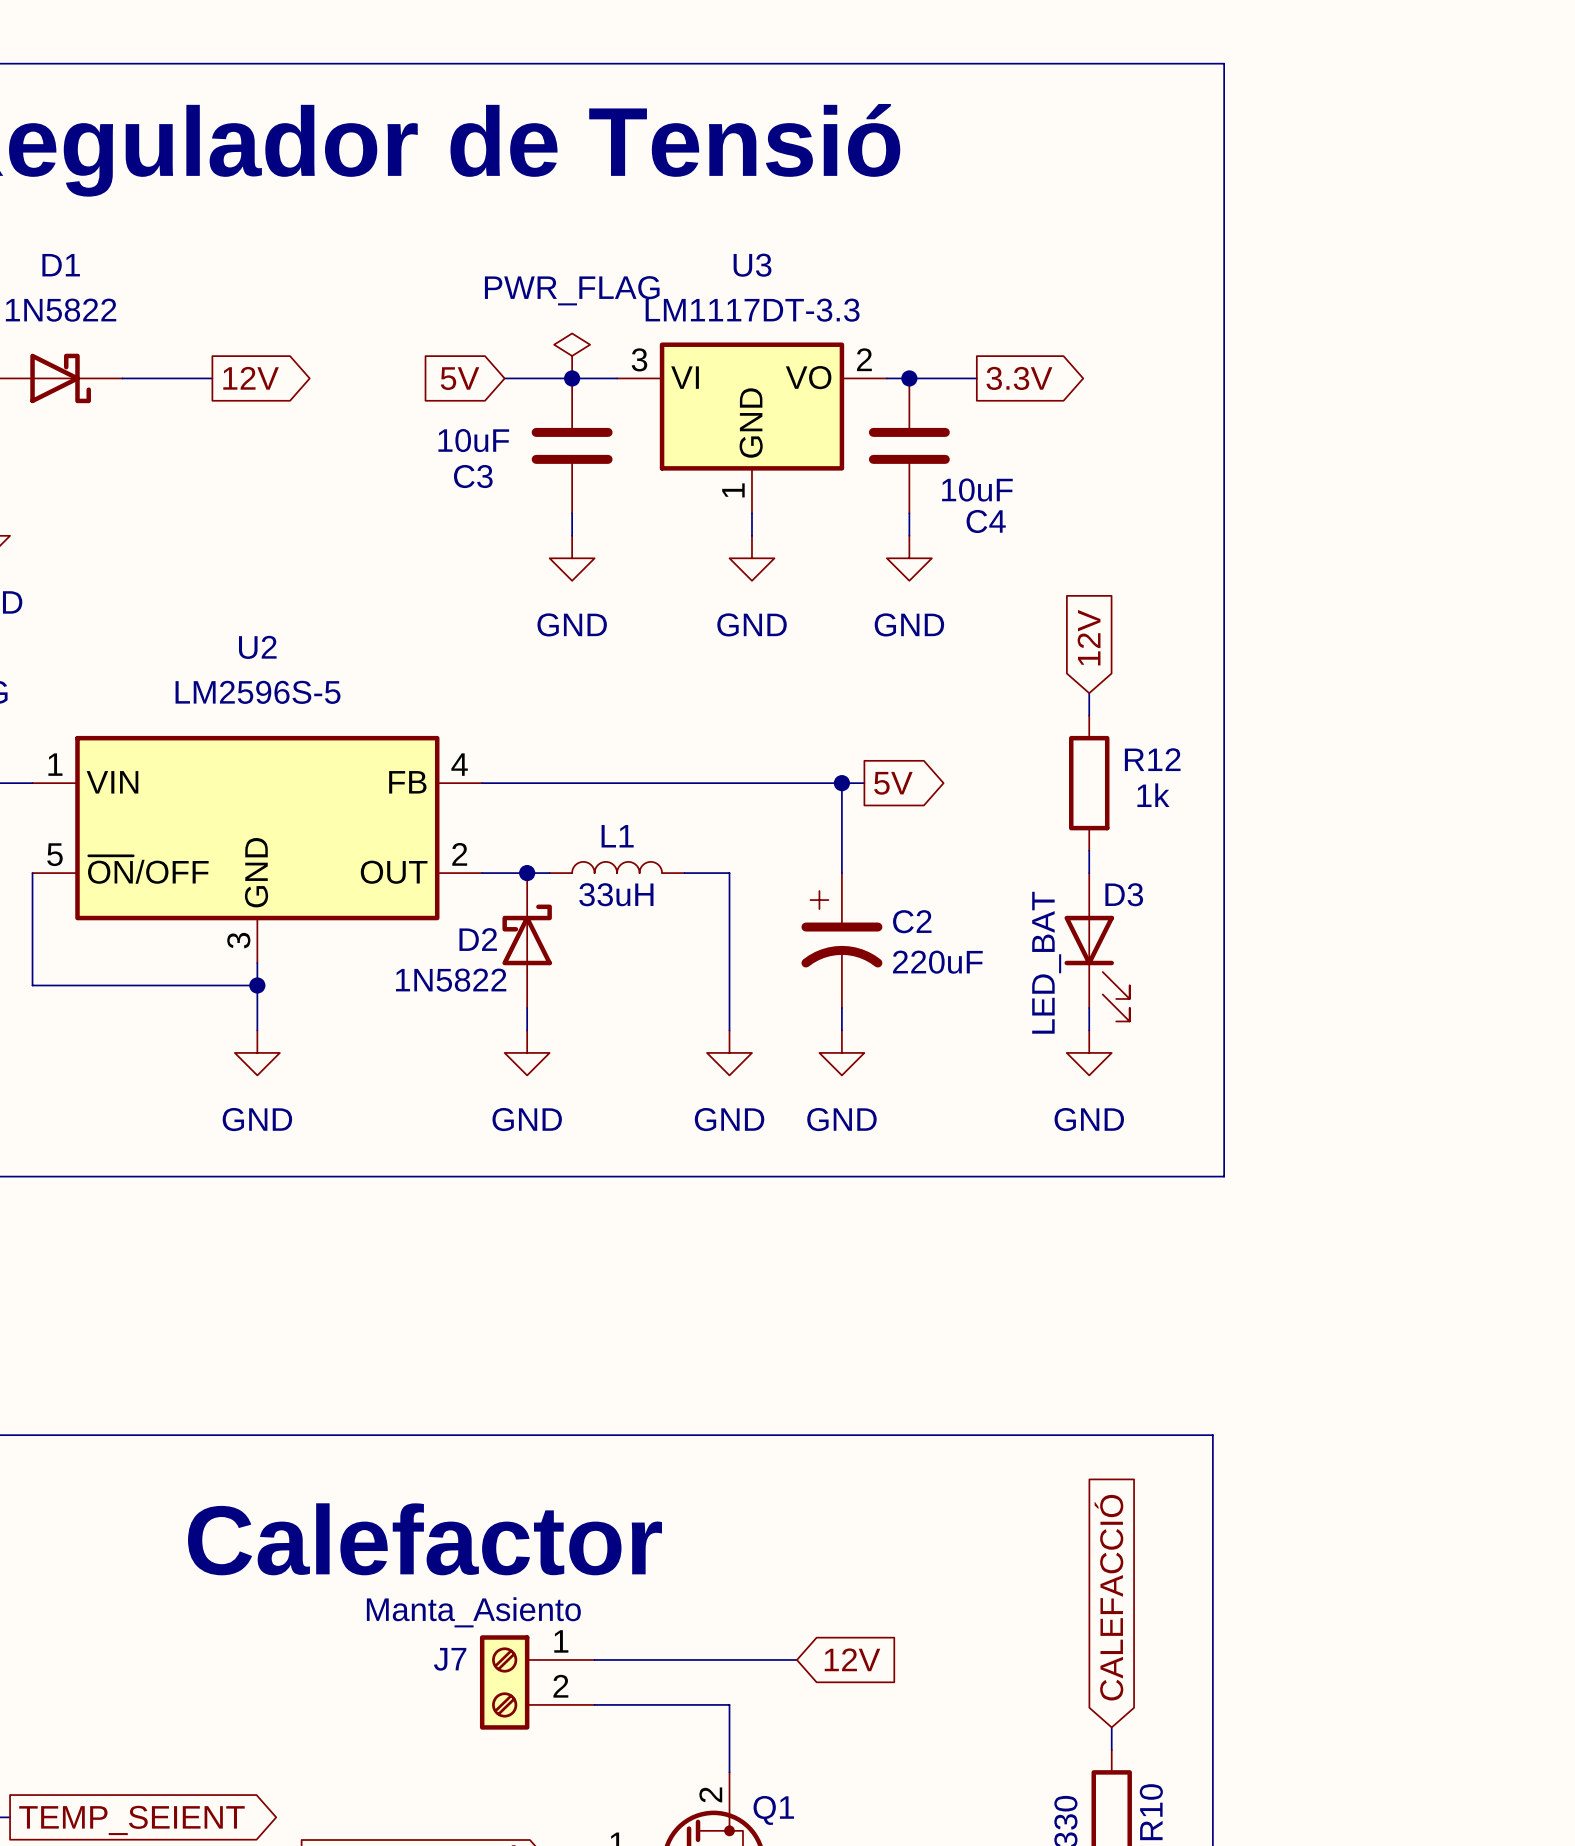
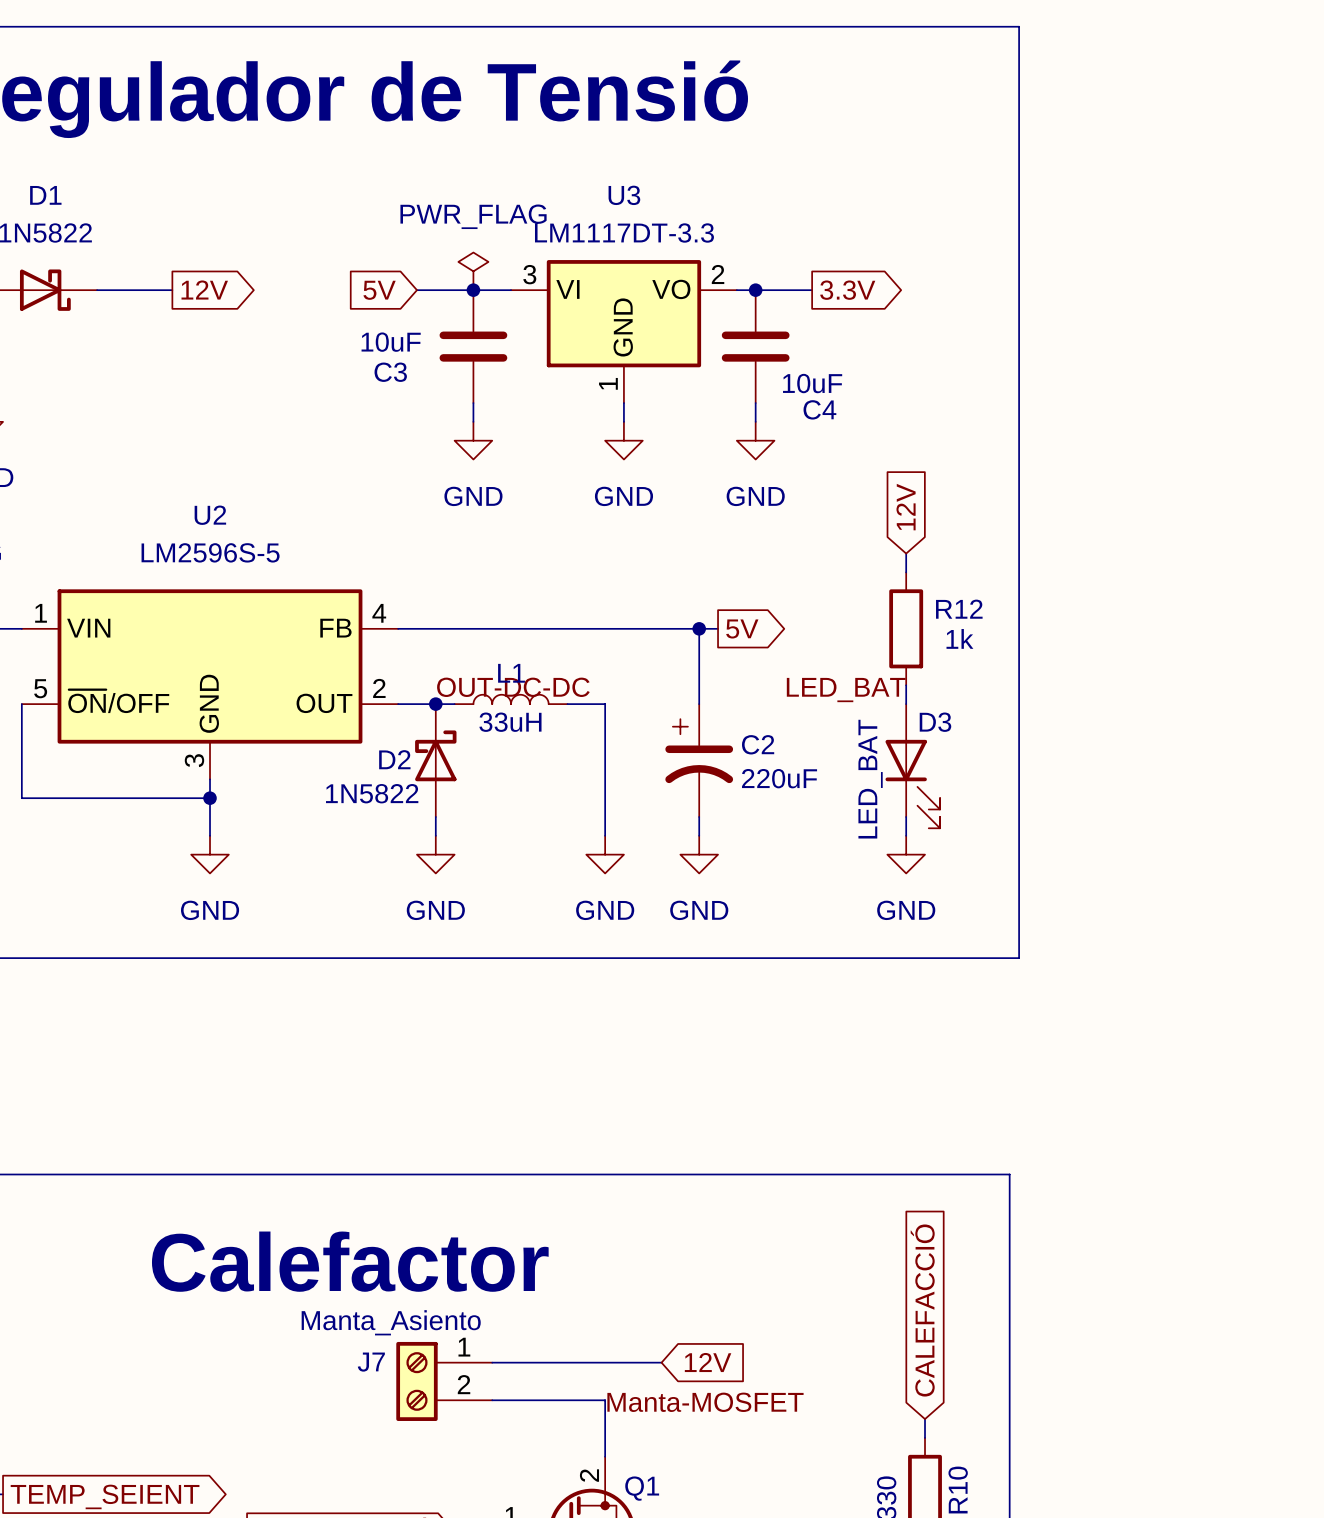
label: none -> OUT-DC-DC (513, 687)
label: none -> LED_BAT (846, 690)
label: none -> Manta-MOSFET (705, 1402)

